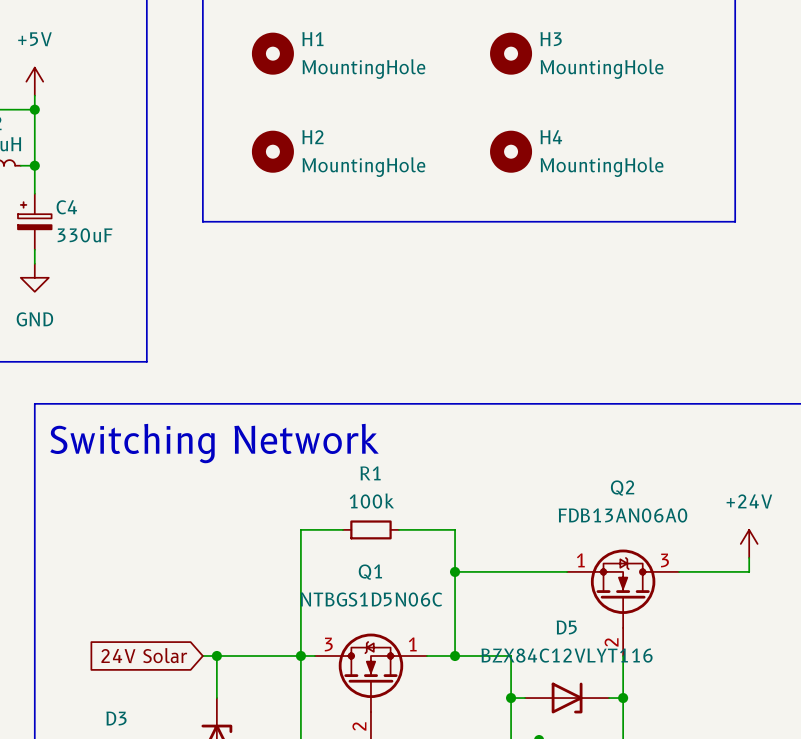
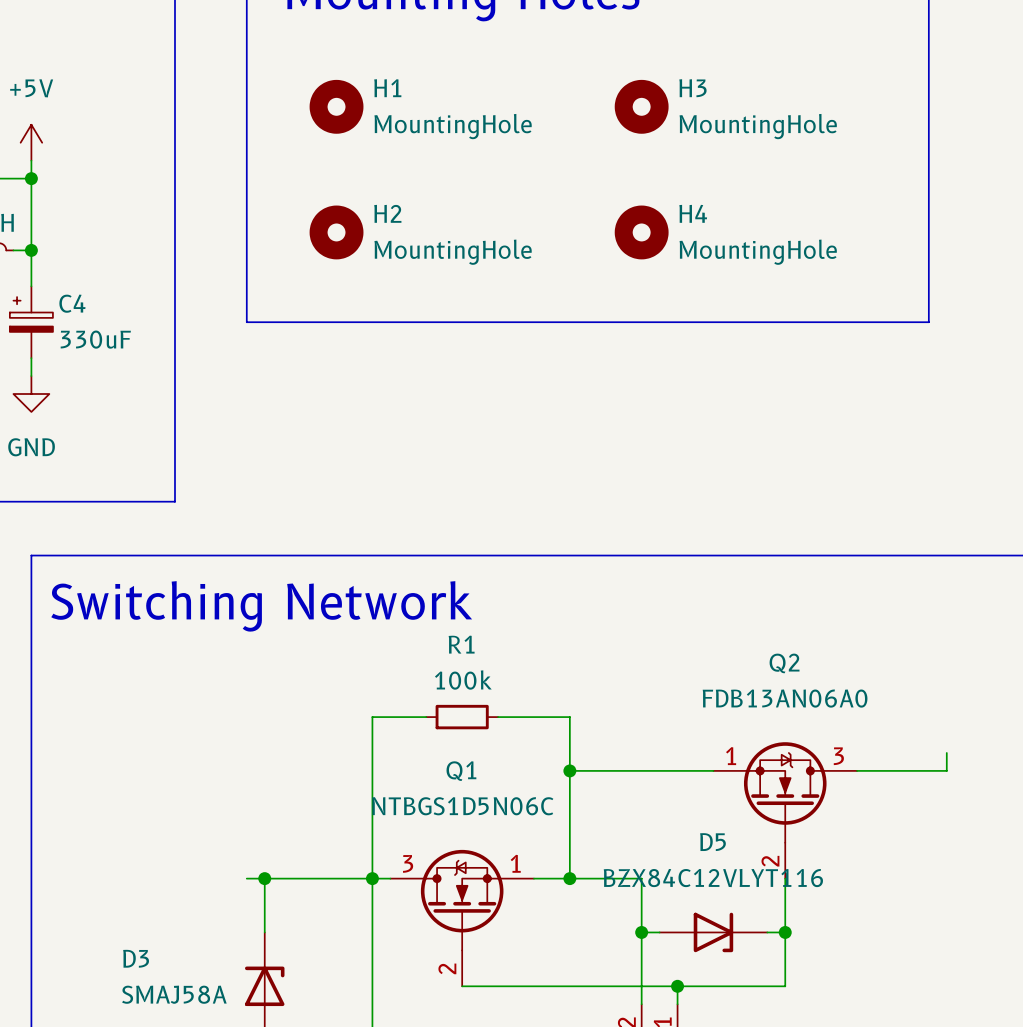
power symbol: +24V (749, 543) -> none
global label: 24V Solar (144, 655) -> none

